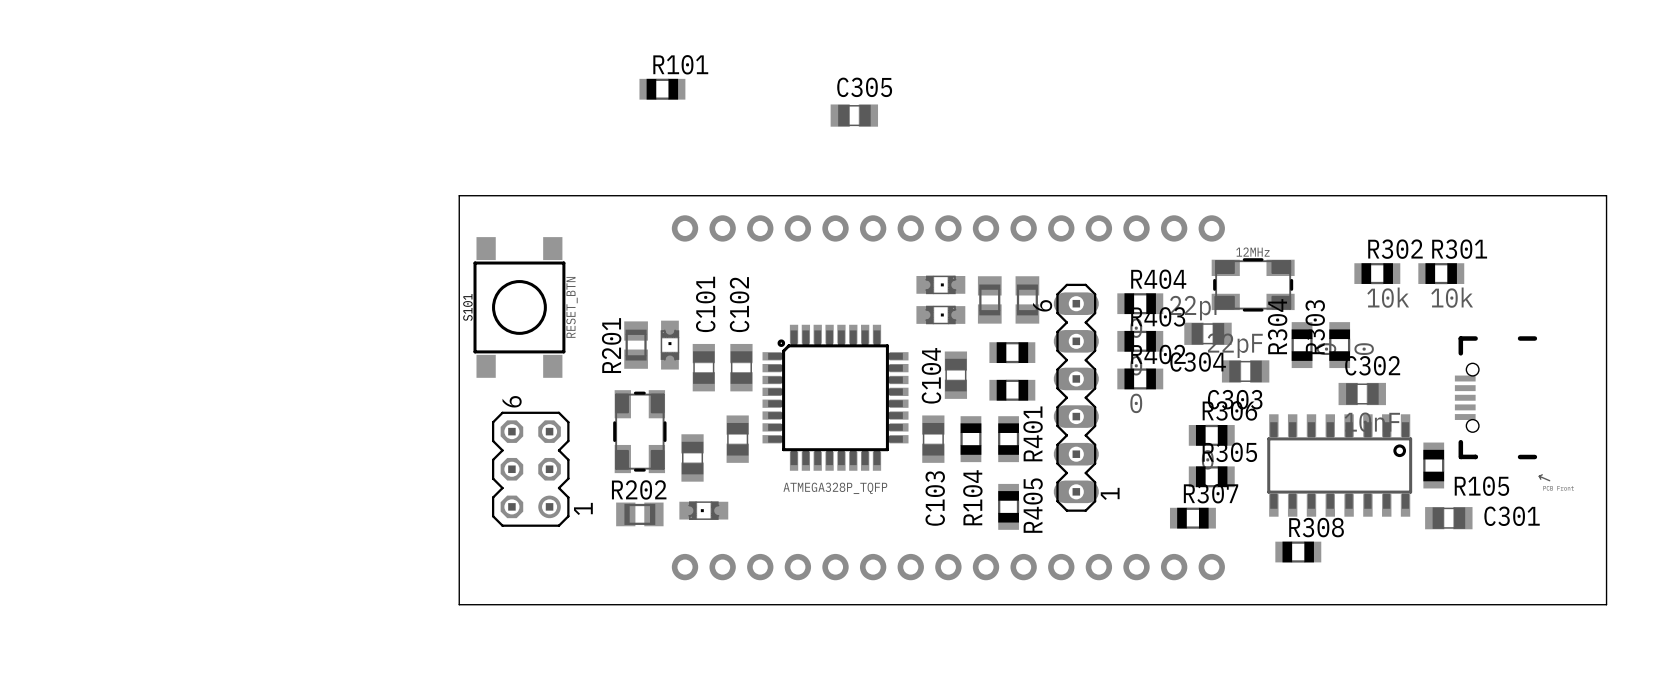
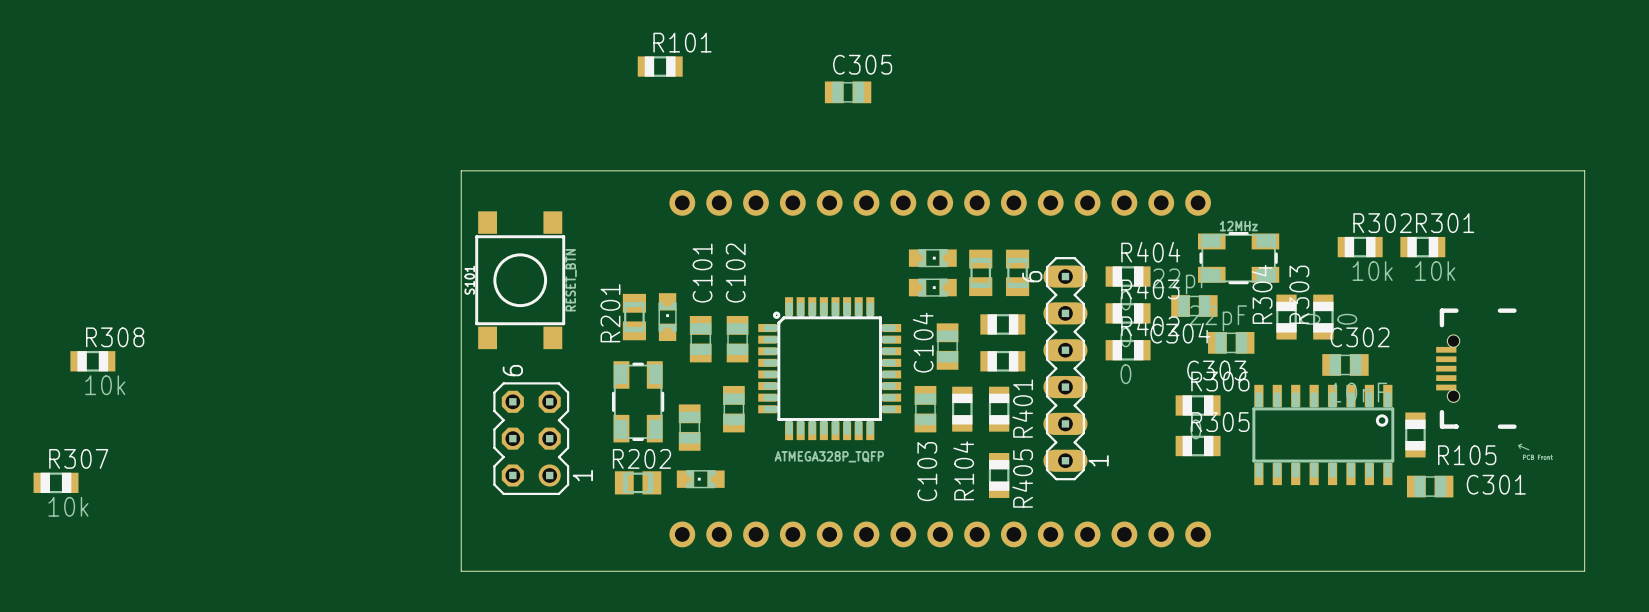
R308 value: none -> 10k (105, 385)
R307 position: (1192, 518) -> (56, 482)
R307 value: none -> 10k (68, 506)
R308 position: (1298, 552) -> (92, 361)

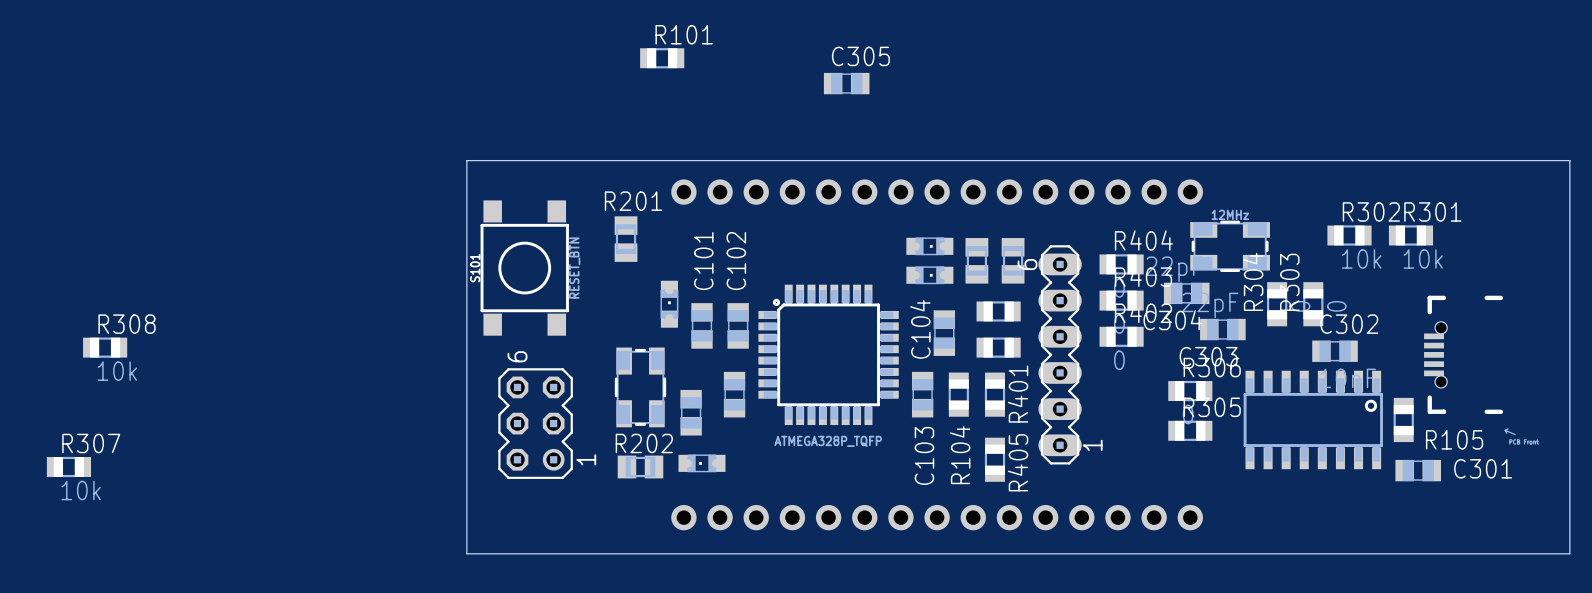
R201 name rotation: 0° (610, 313) -> 90° clockwise (633, 201)
R201 position: (634, 317) -> (626, 239)

